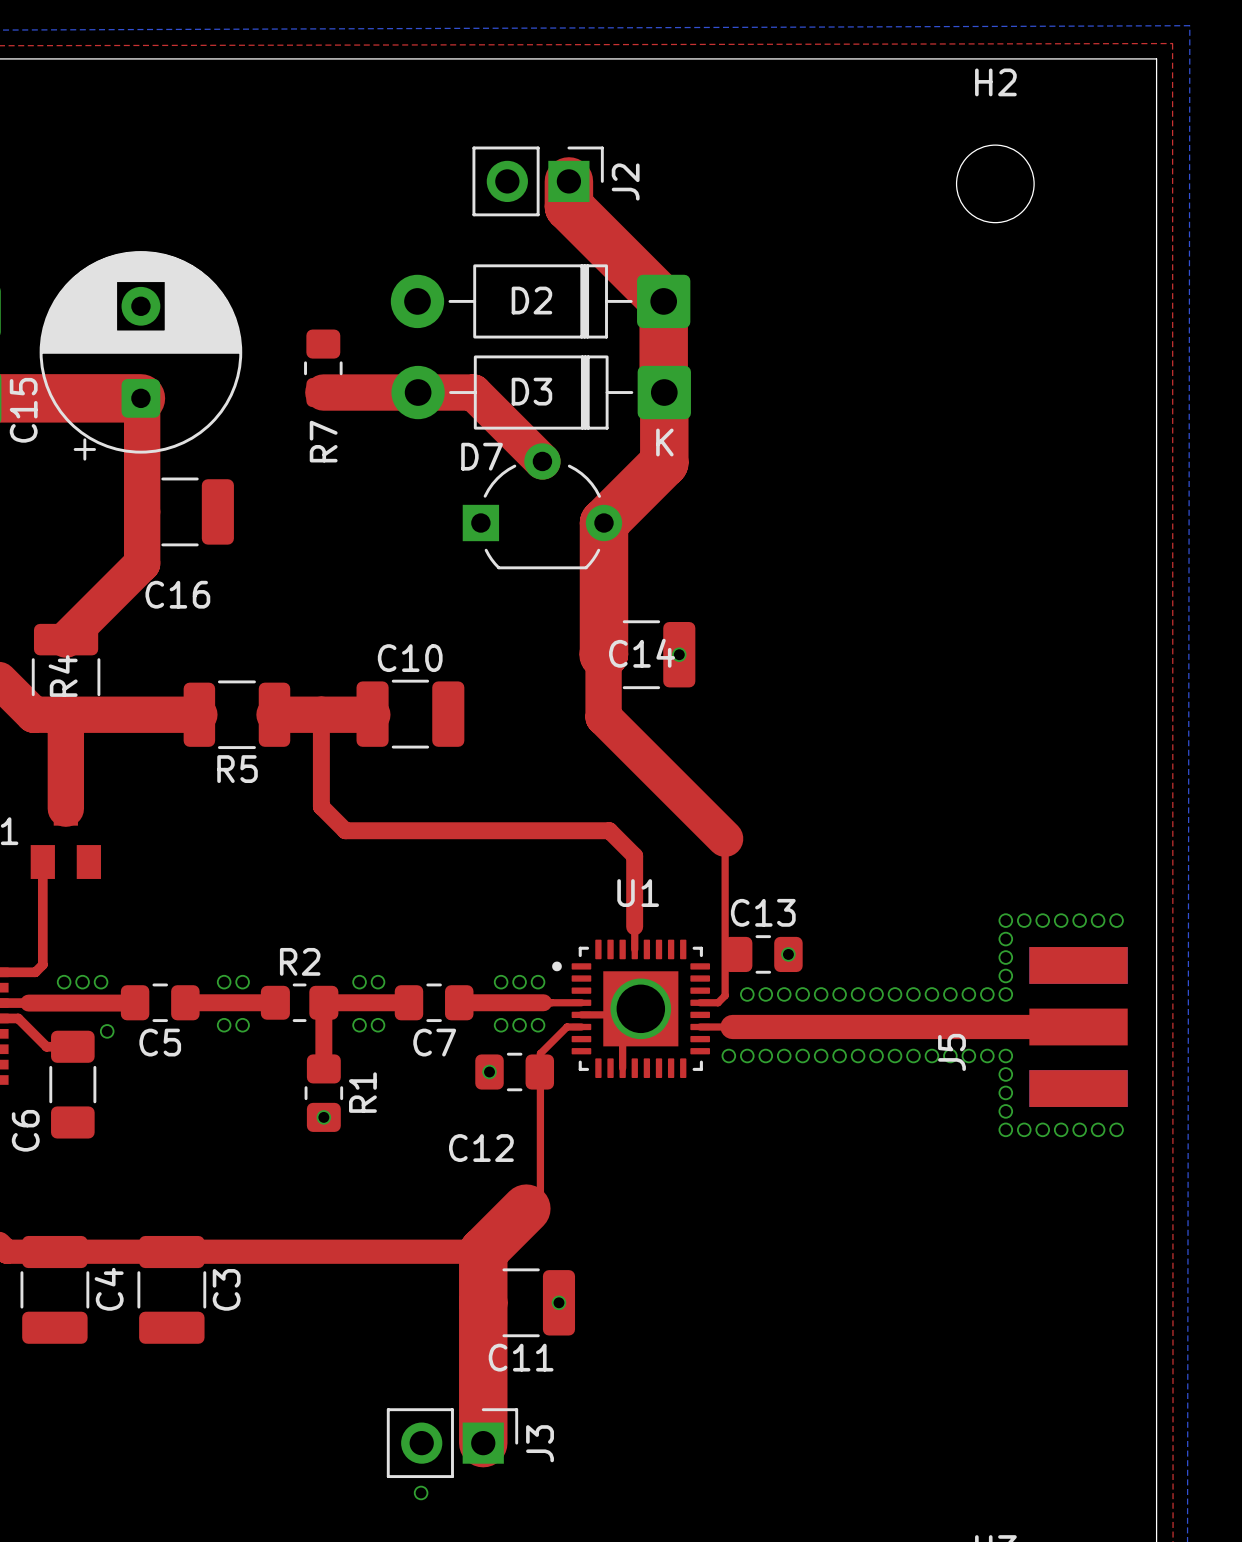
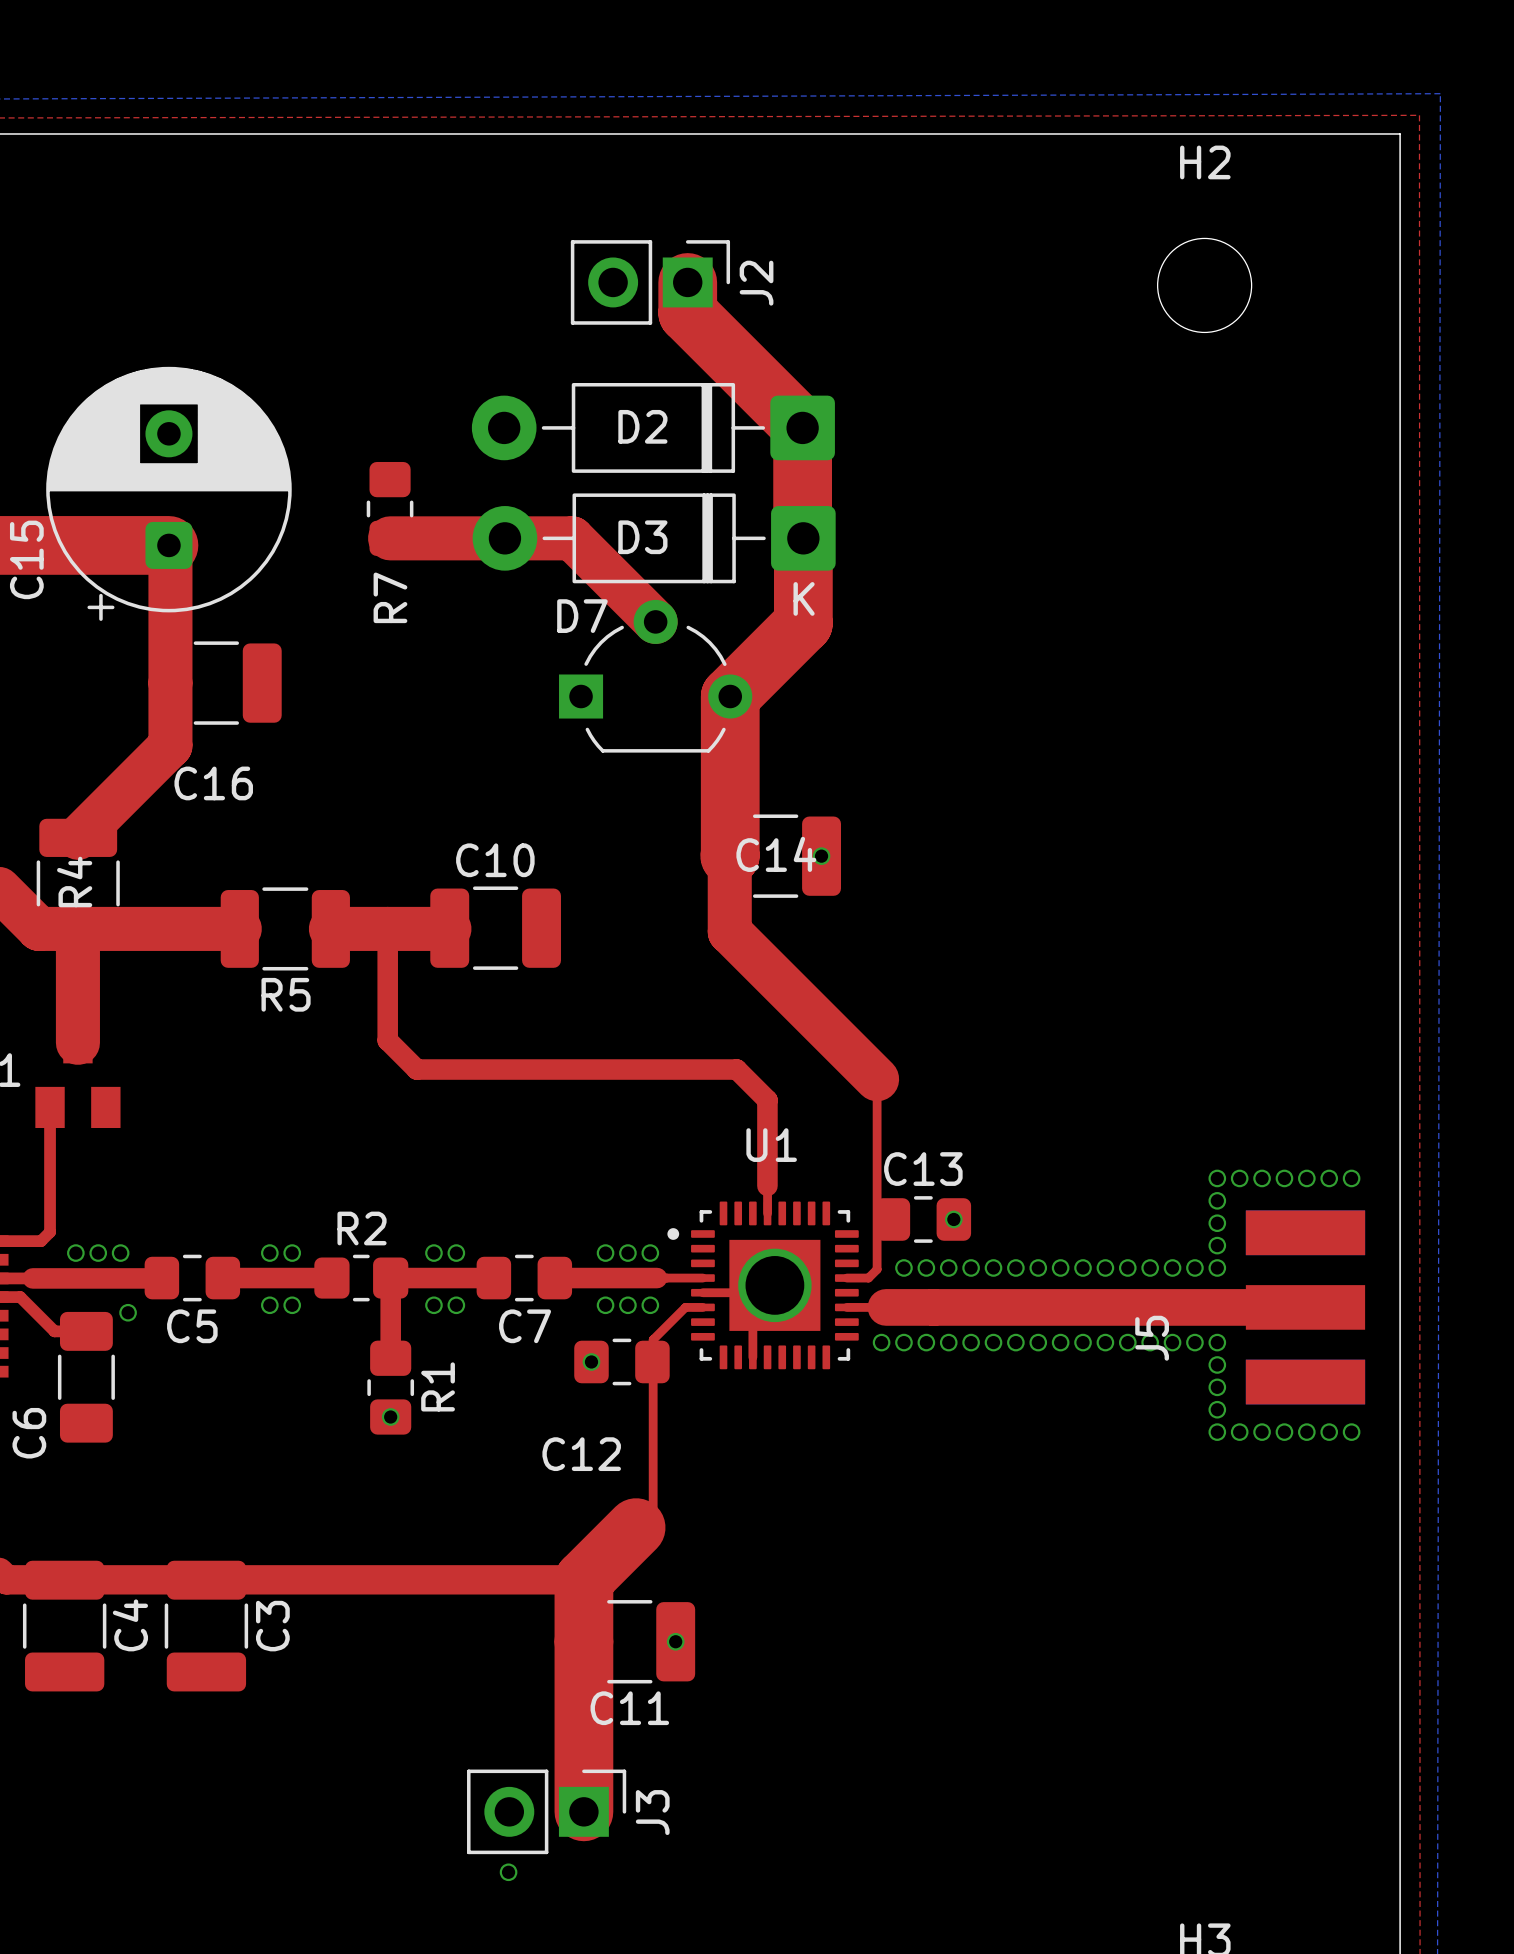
top track width: thin (732, 1026) (1078, 1026) -> thick (886, 1307) (1305, 1307)

